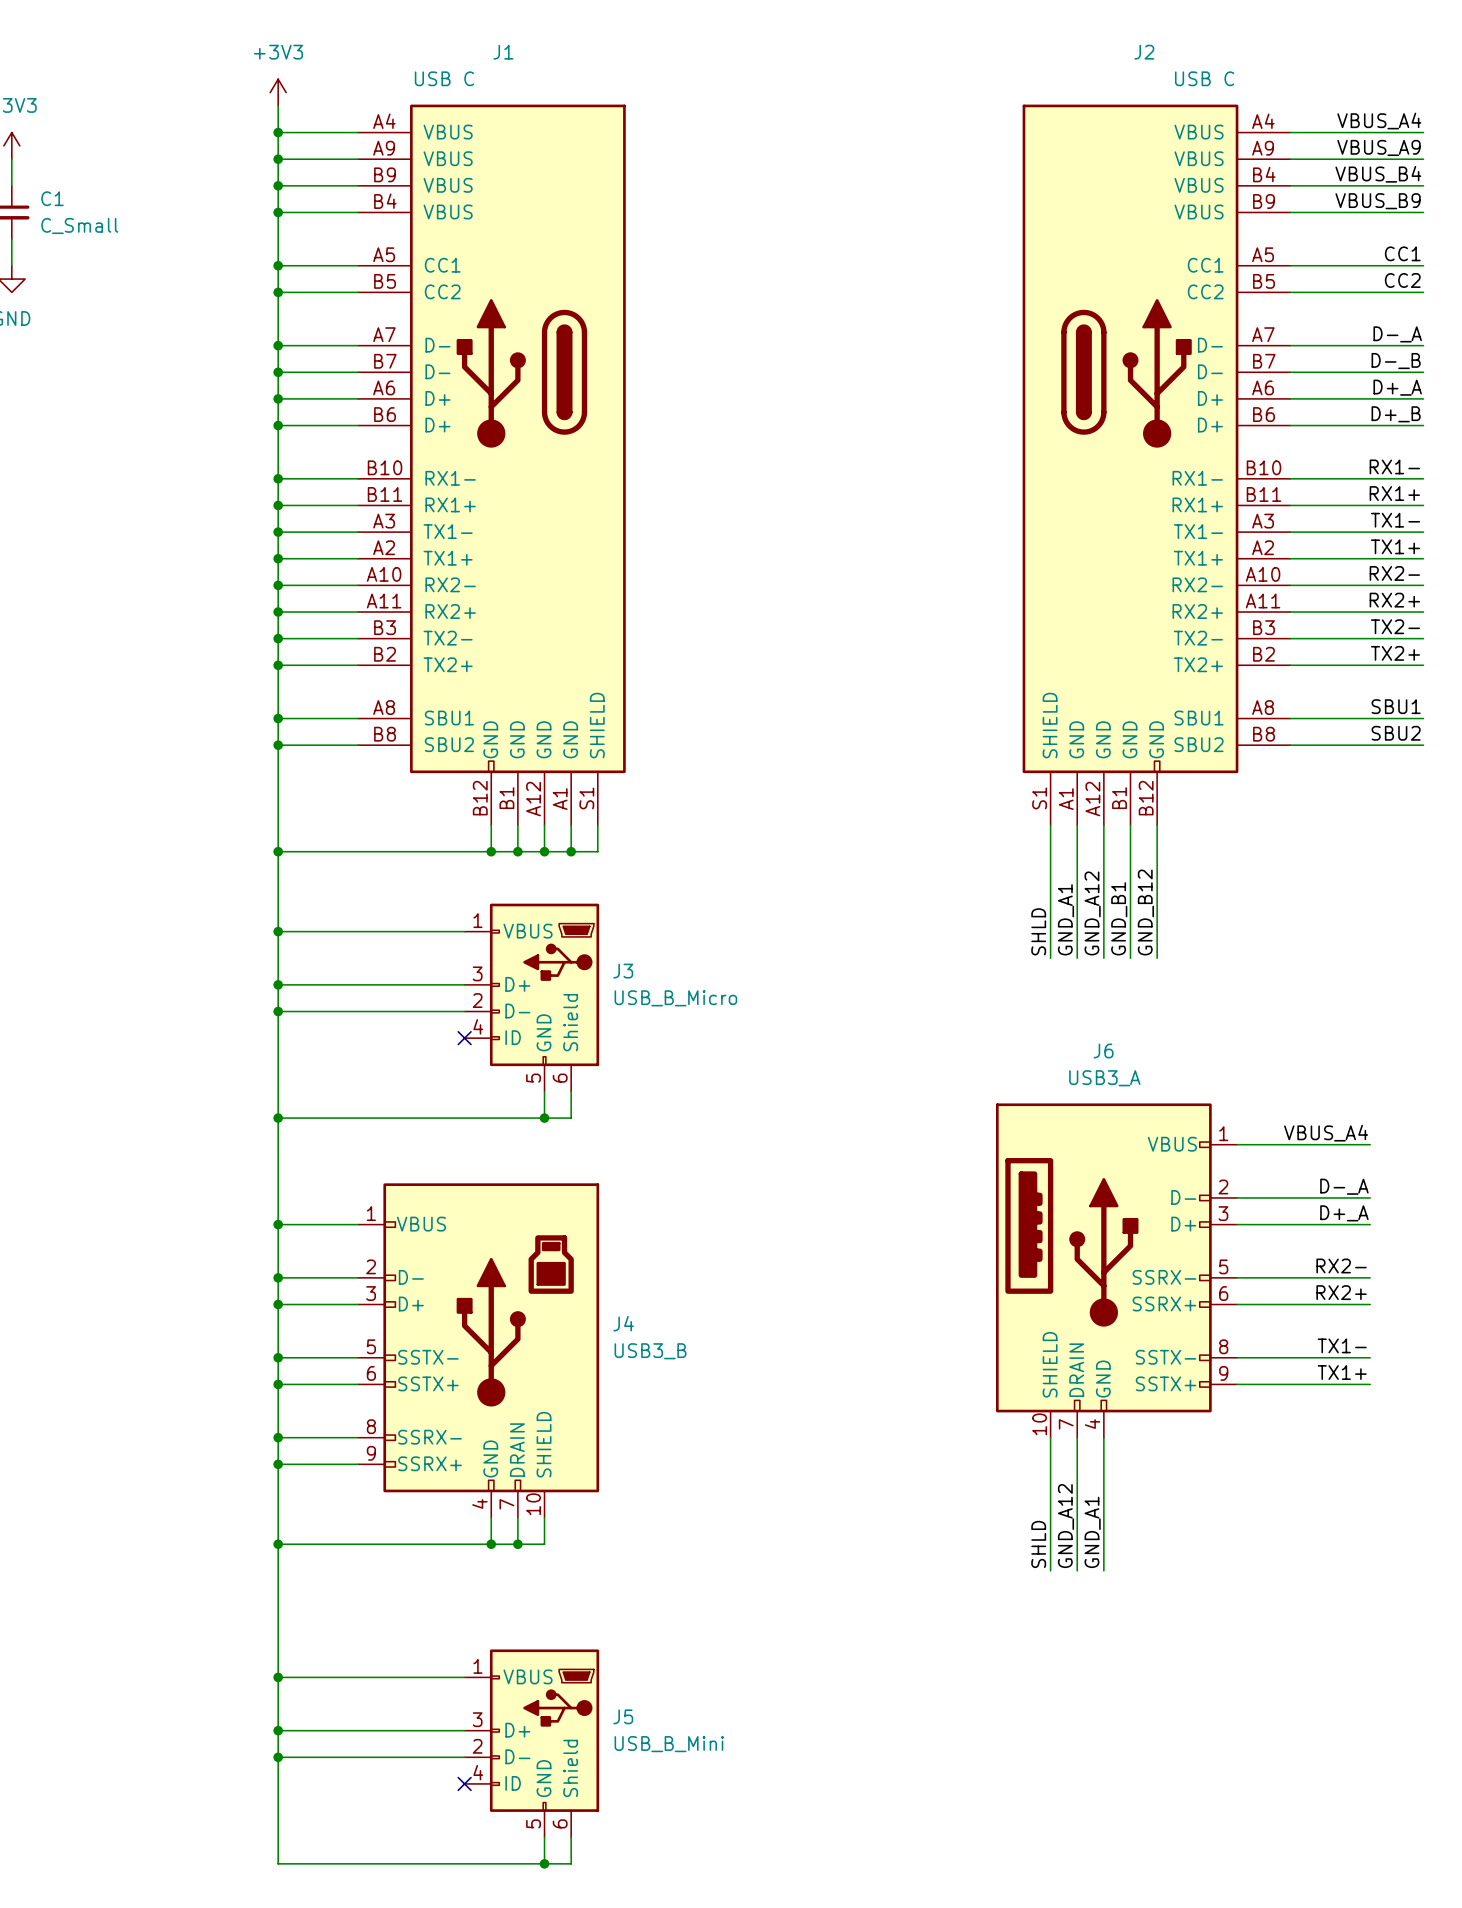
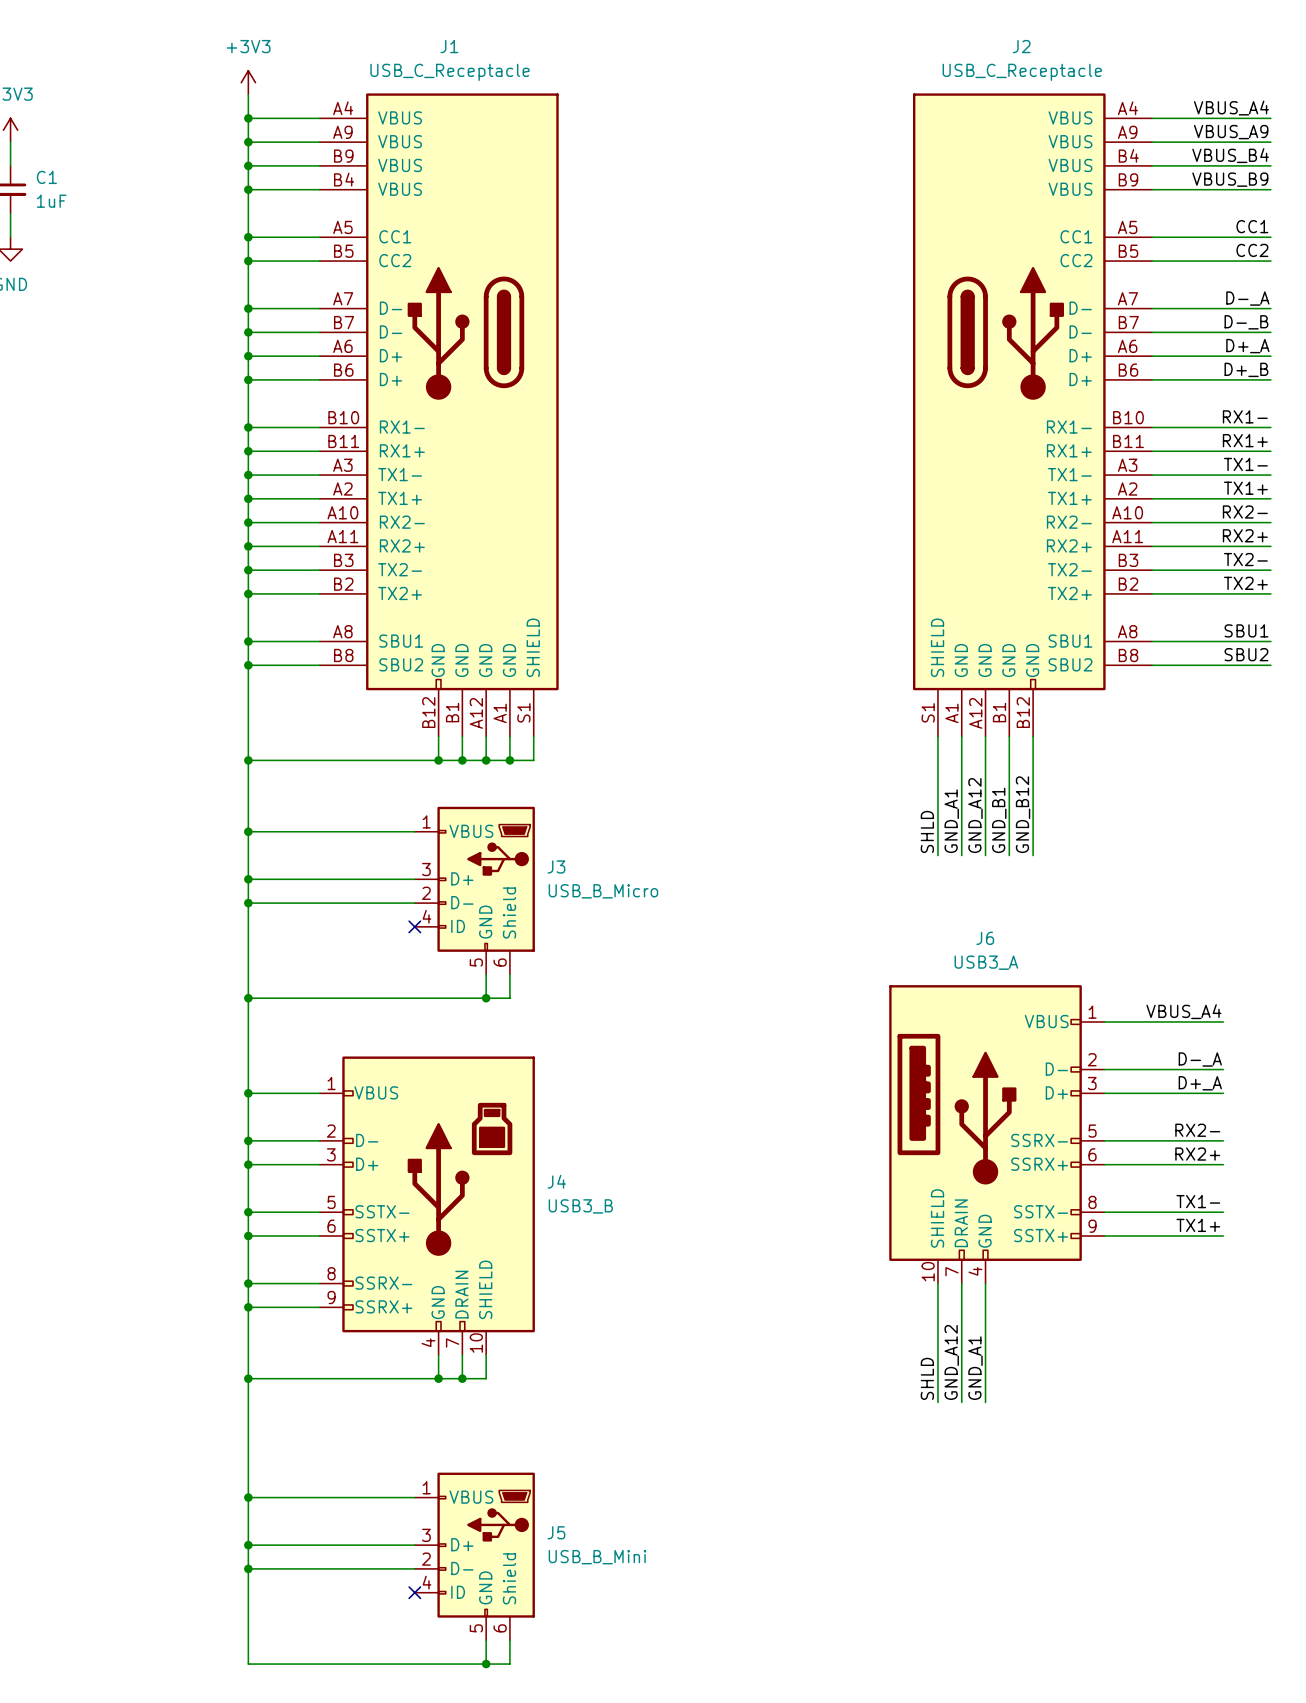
J1 value: USB C (444, 78) -> USB_C_Receptacle (450, 72)
J2 value: USB C (1204, 78) -> USB_C_Receptacle (1022, 72)
C1 value: C_Small (79, 225) -> 1uF (51, 201)

